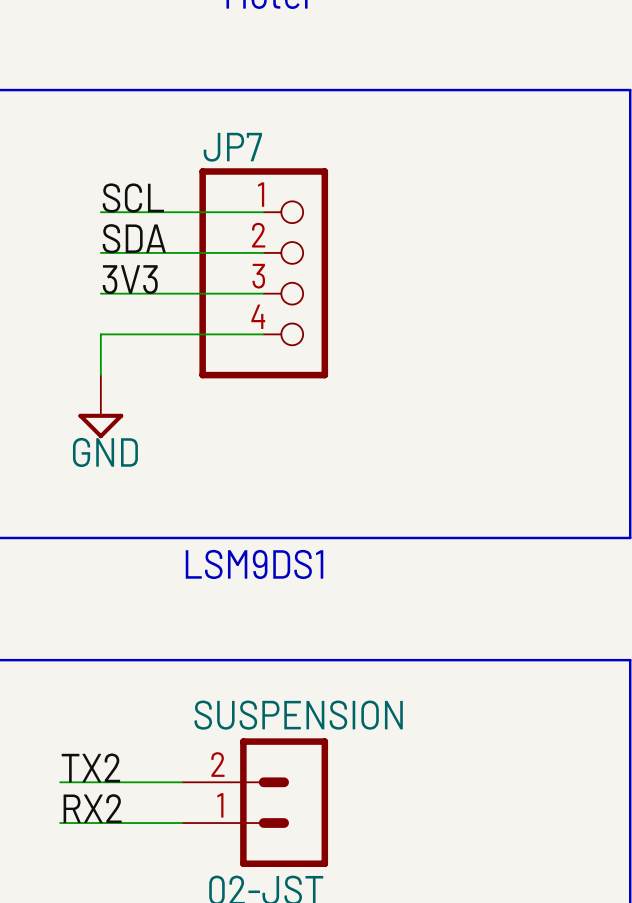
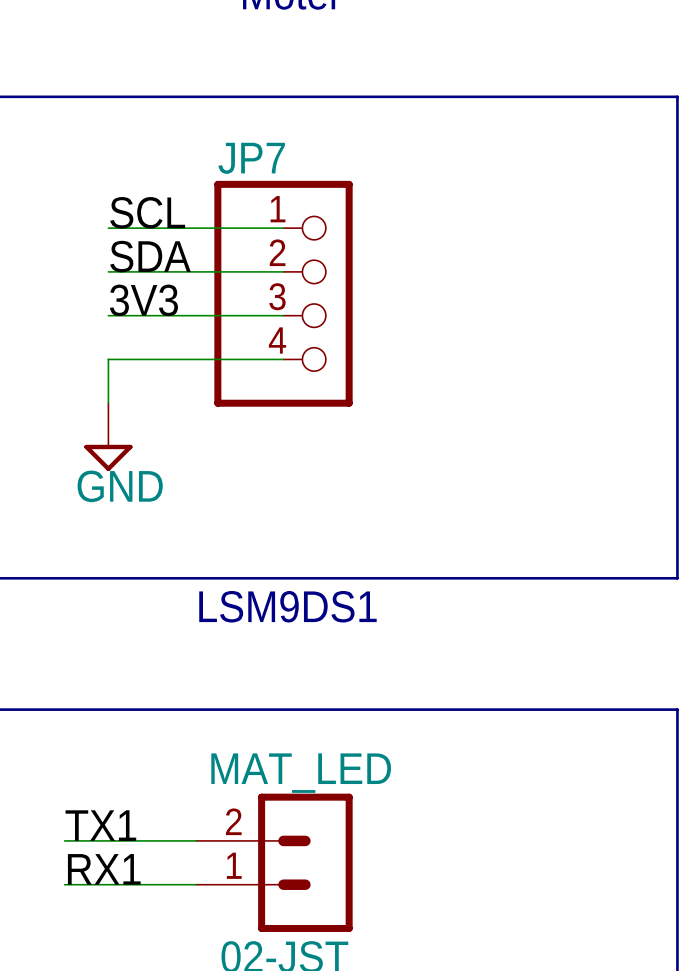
SUSPENSION name: SUSPENSION (298, 715) -> MAT_LED (301, 773)
label: TX2 (90, 767) -> TX1 (100, 825)
label: RX2 (92, 808) -> RX1 (104, 869)

